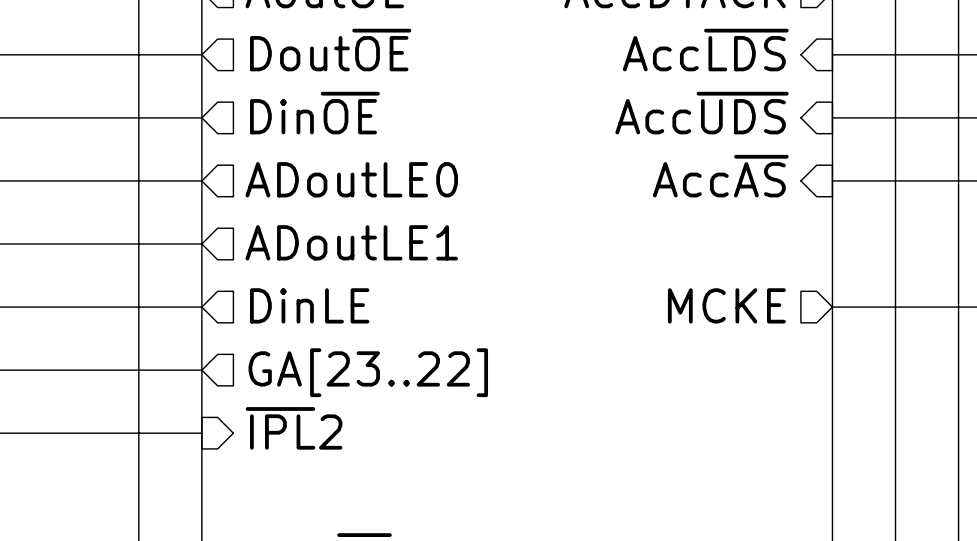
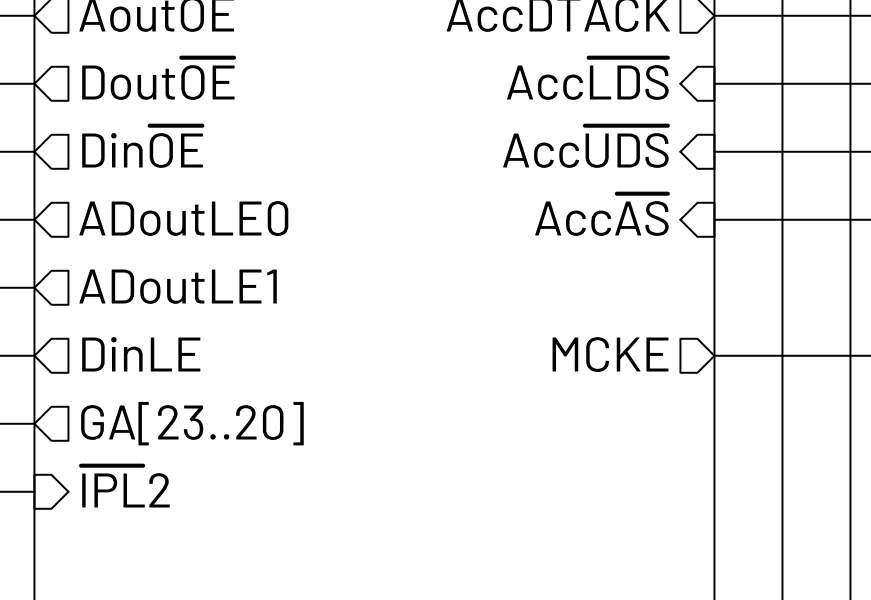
sheet pin: GA[23..22] (368, 372) -> GA[23..20] (192, 423)

